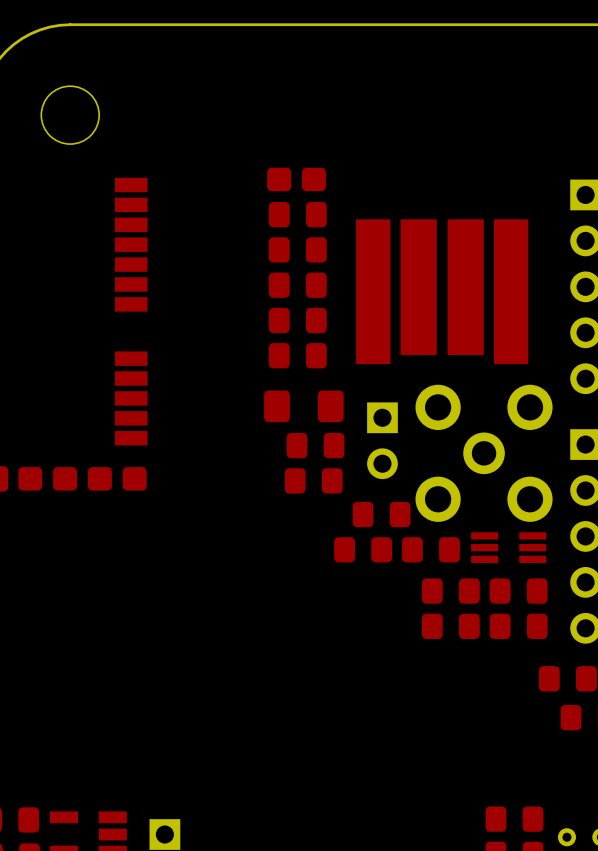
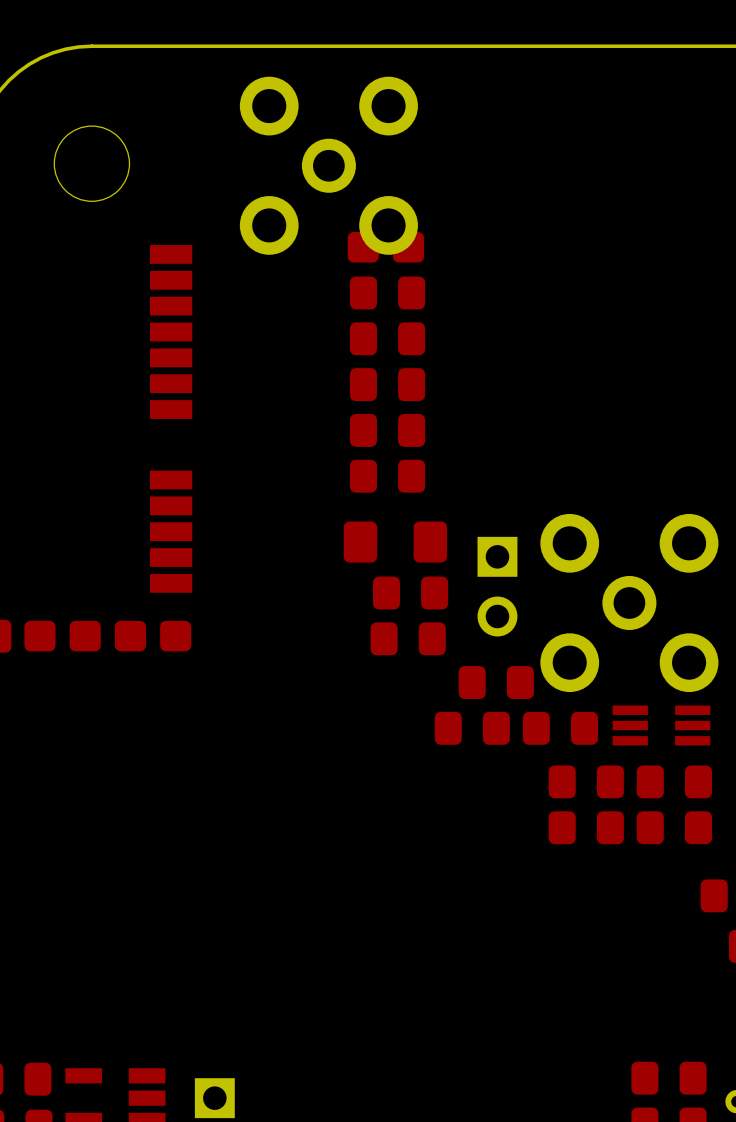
part: none -> (328, 165)
part: (442, 291) -> none

